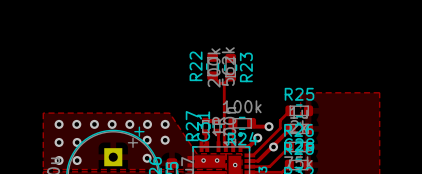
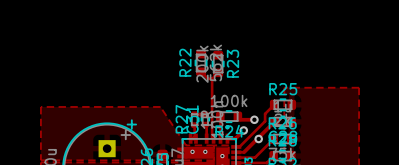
via: (59, 124) -> none
via: (76, 124) -> none
via: (94, 124) -> none
via: (112, 124) -> none
via: (129, 124) -> none
via: (147, 124) -> none
via: (165, 124) -> none
via: (147, 140) -> none
via: (165, 140) -> none
via: (59, 142) -> none
via: (77, 142) -> none
via: (147, 158) -> none
via: (59, 160) -> none
via: (77, 160) -> none

